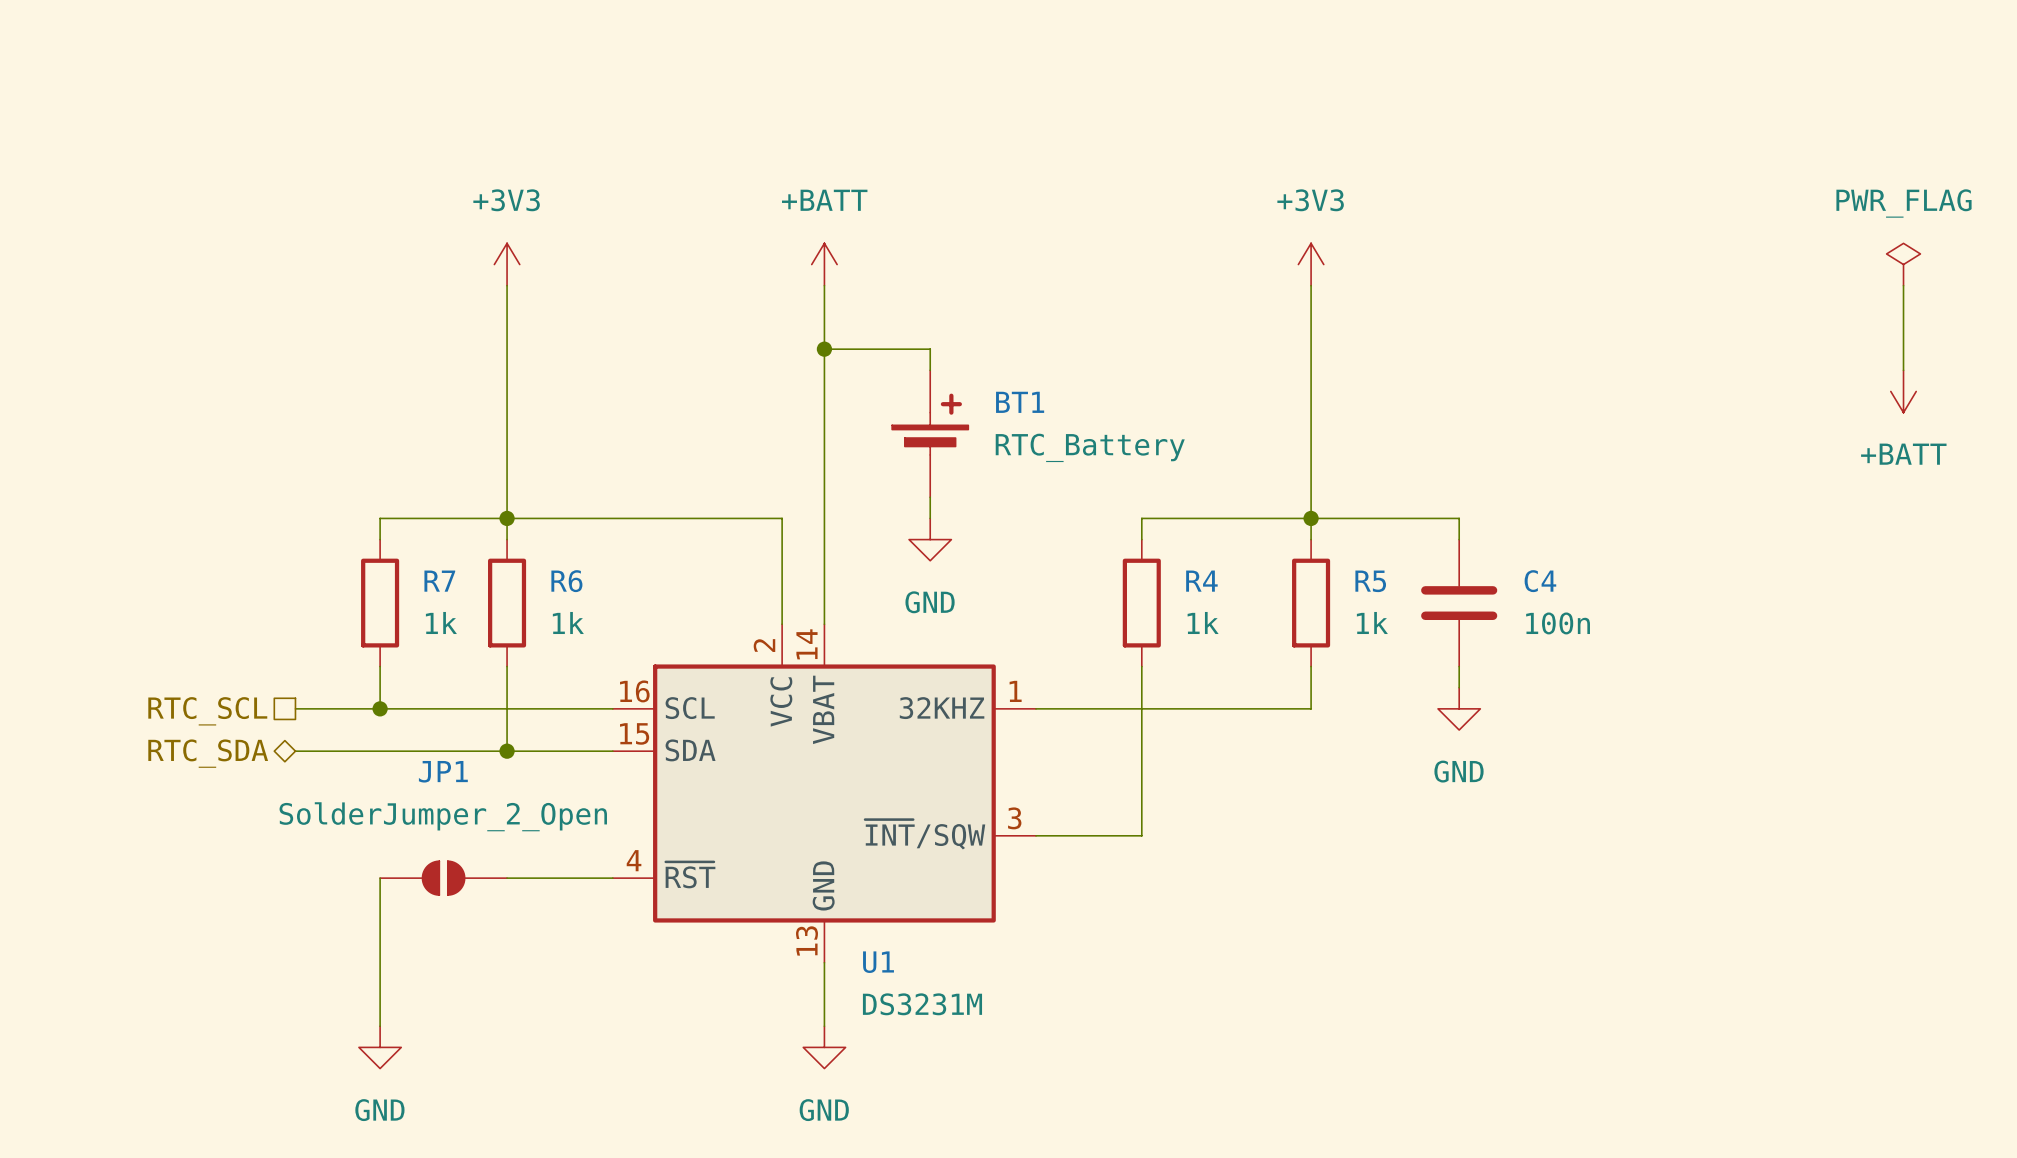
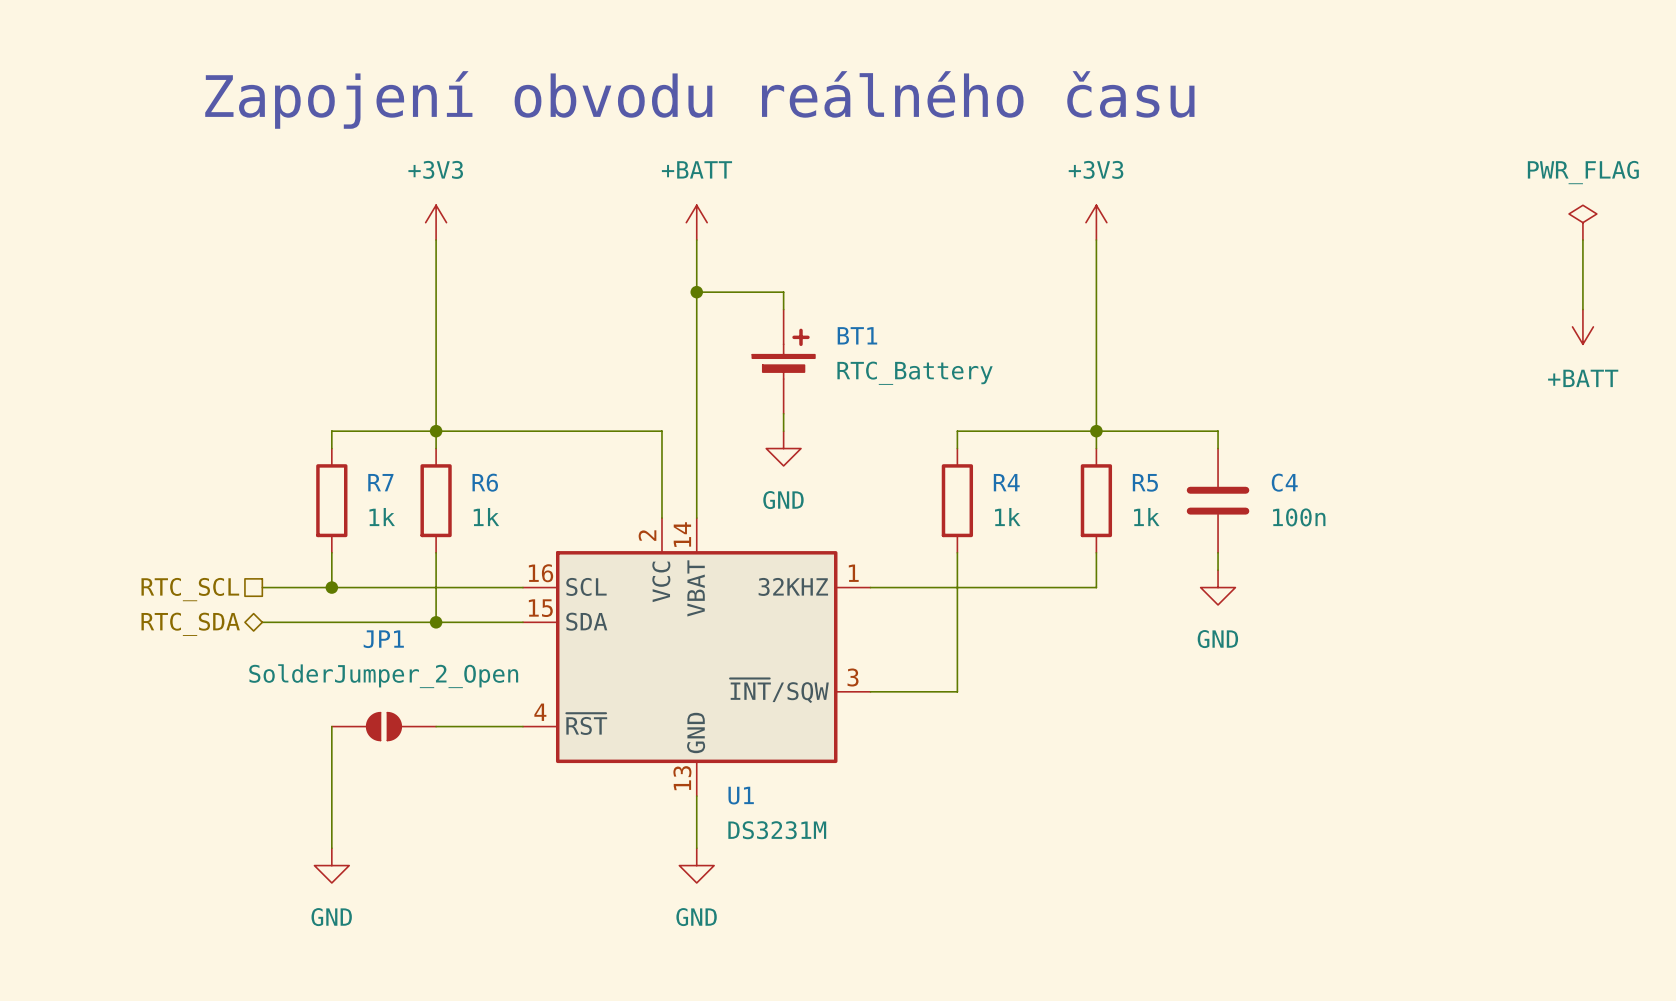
text: none -> Zapojení obvodu reálného času (699, 99)

